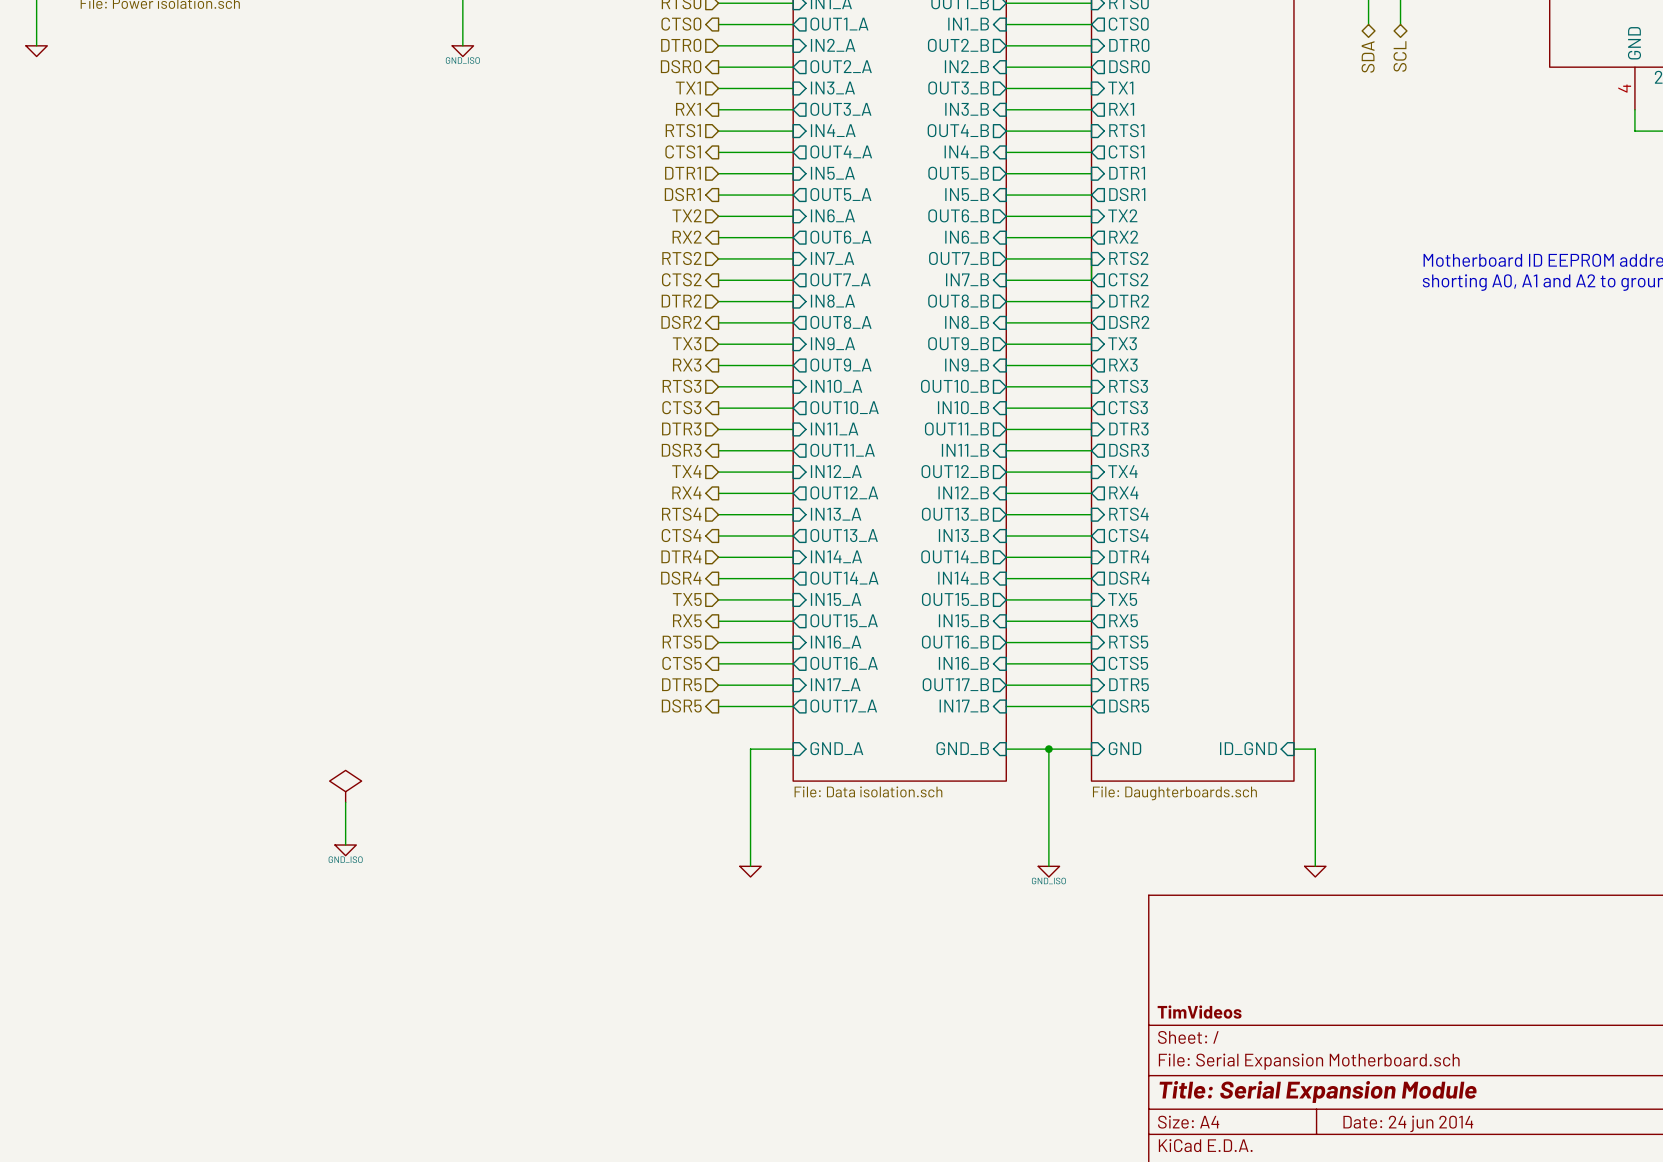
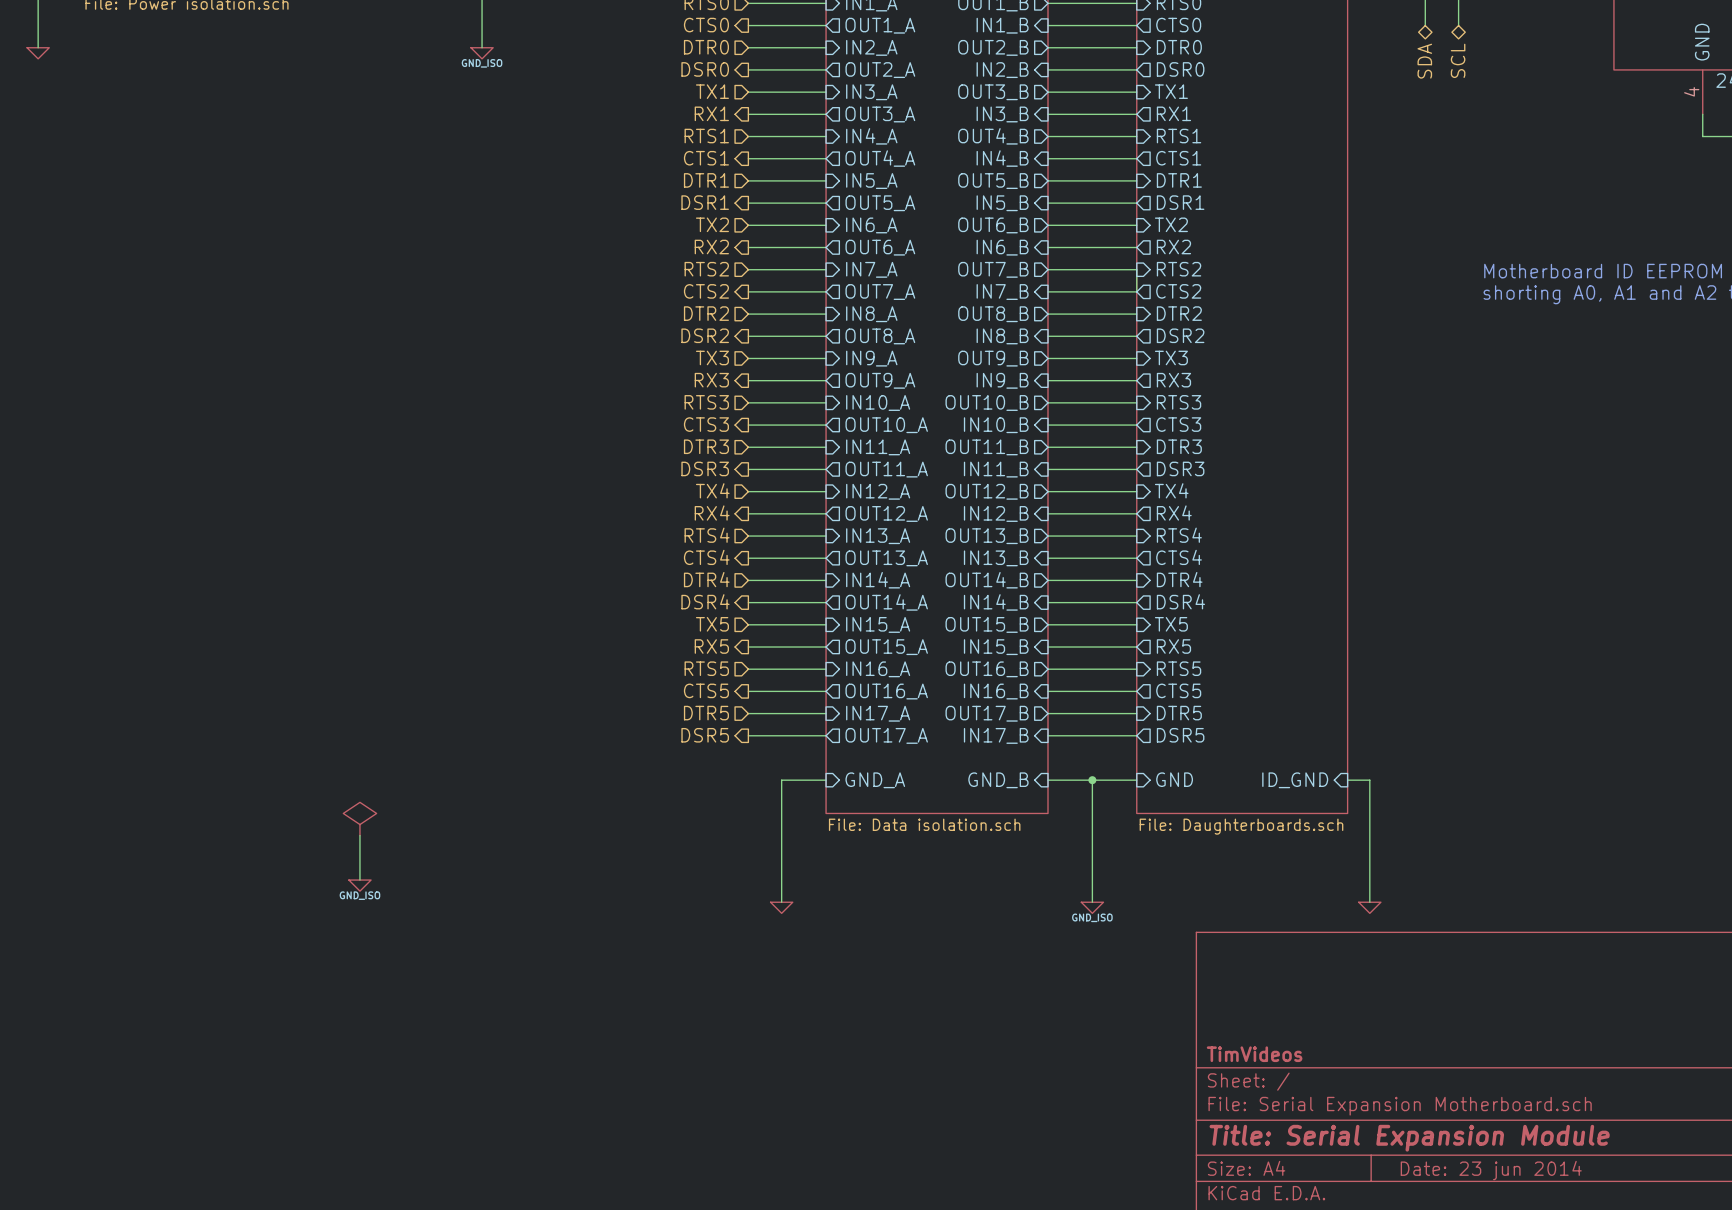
title block: Date: 24 jun 2014 (1408, 1123) -> Date: 23 jun 2014 (1491, 1170)

